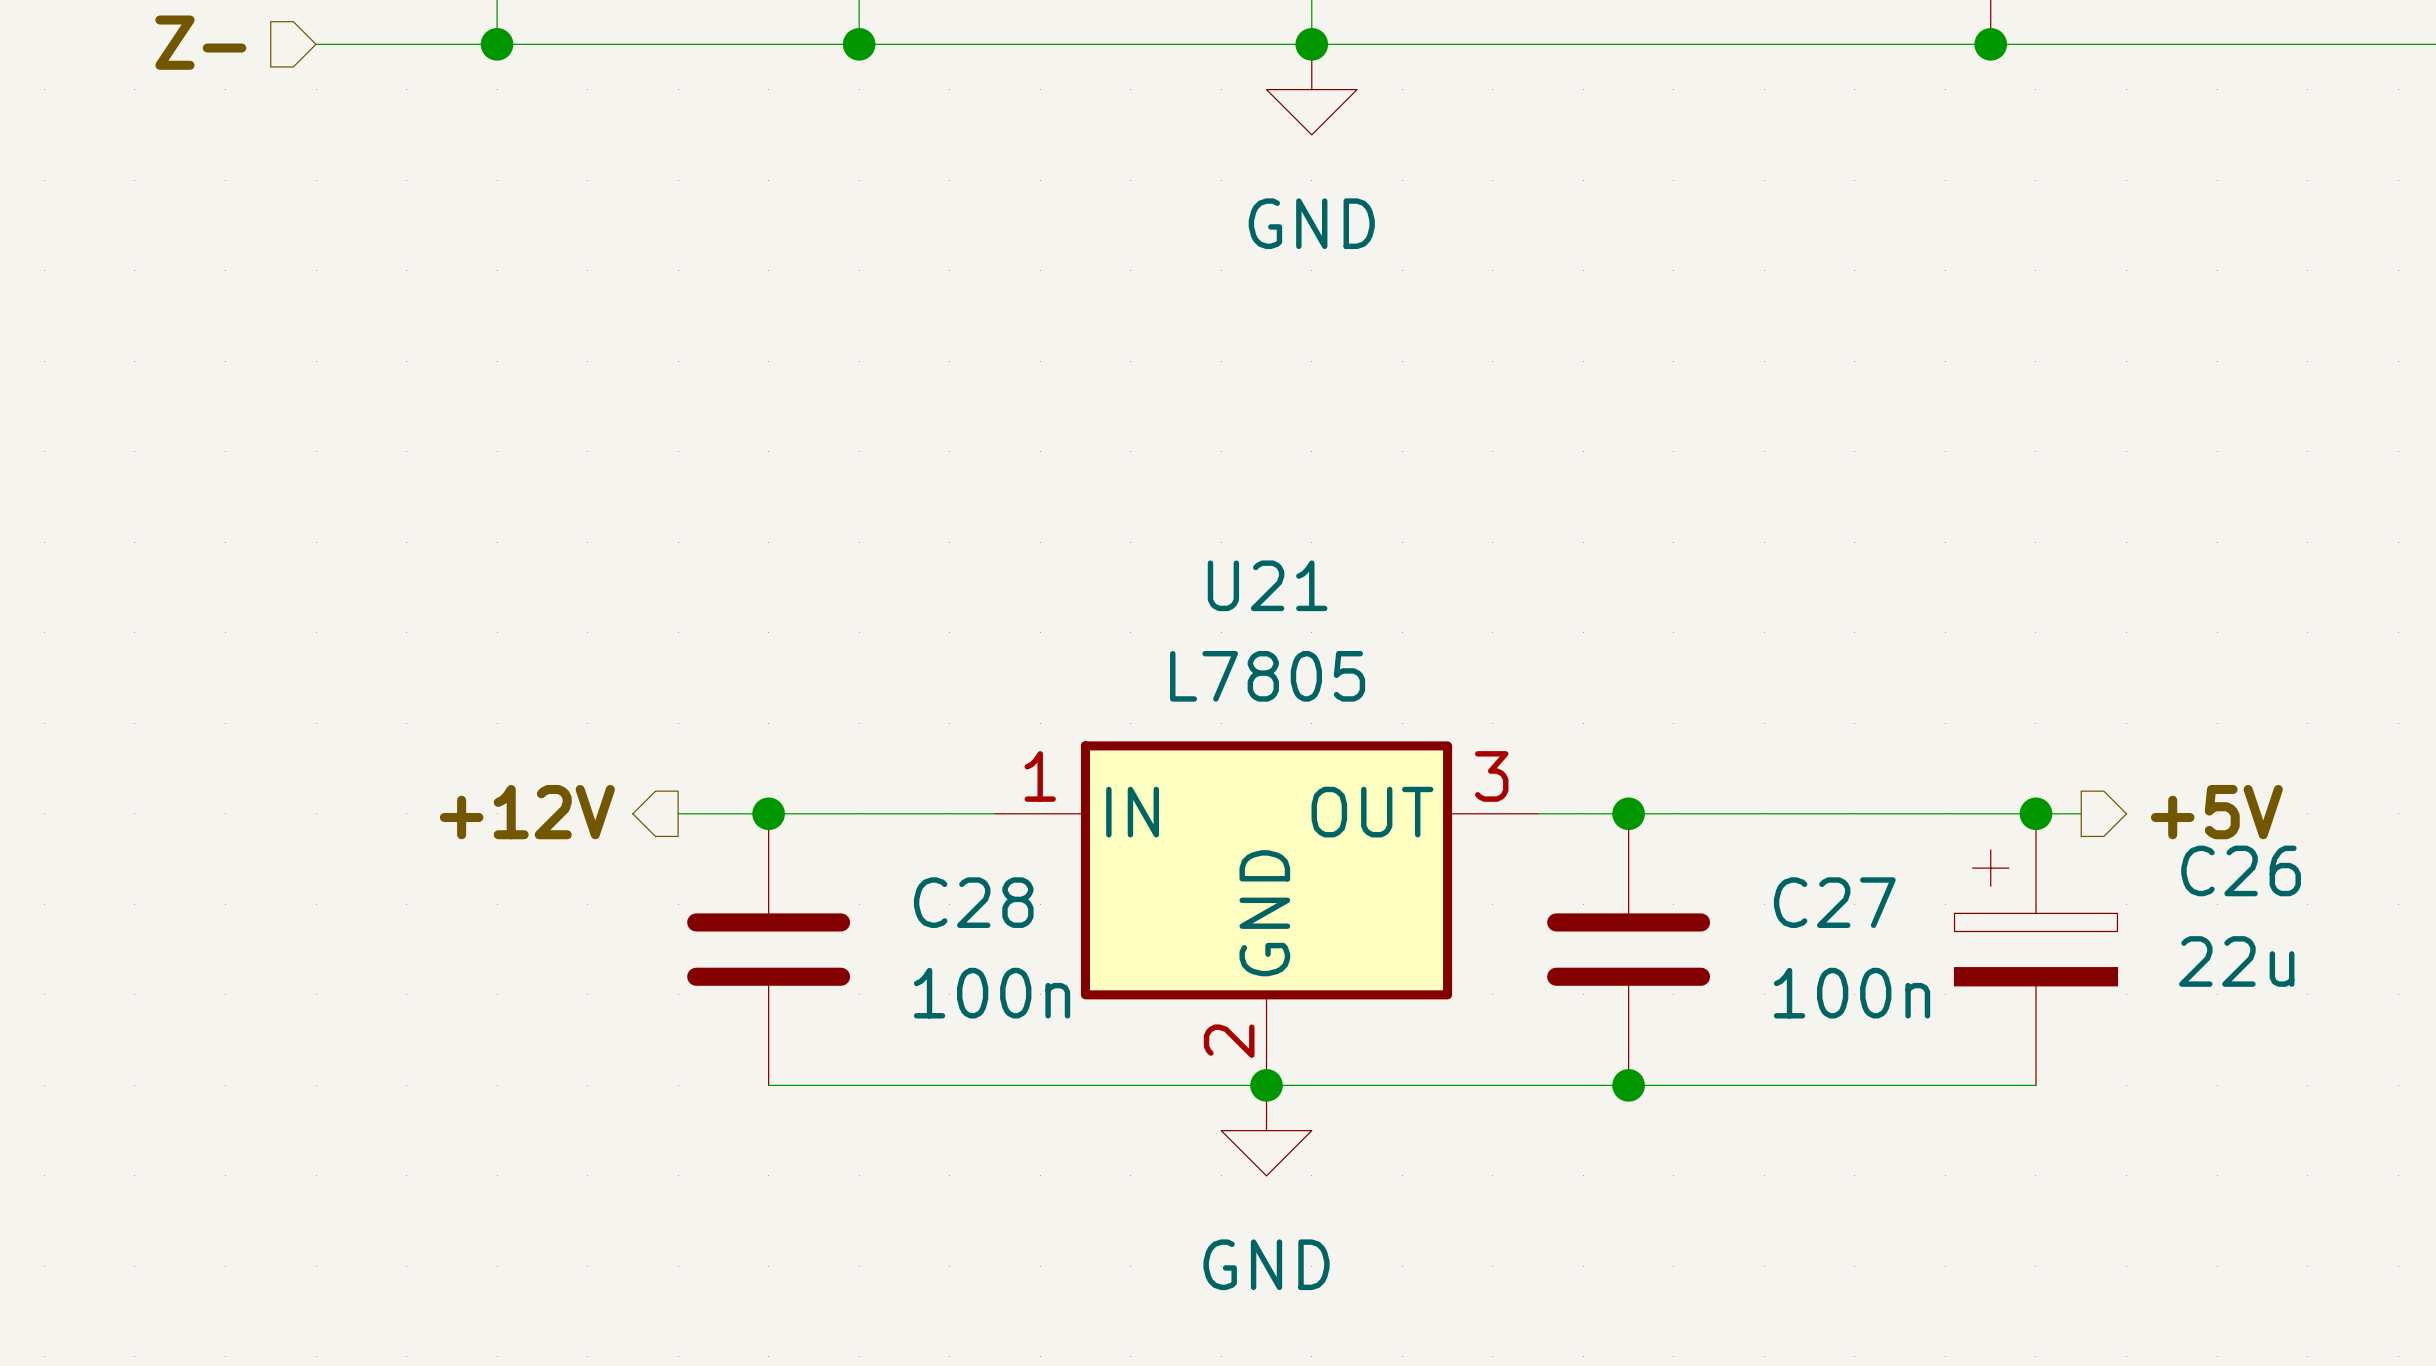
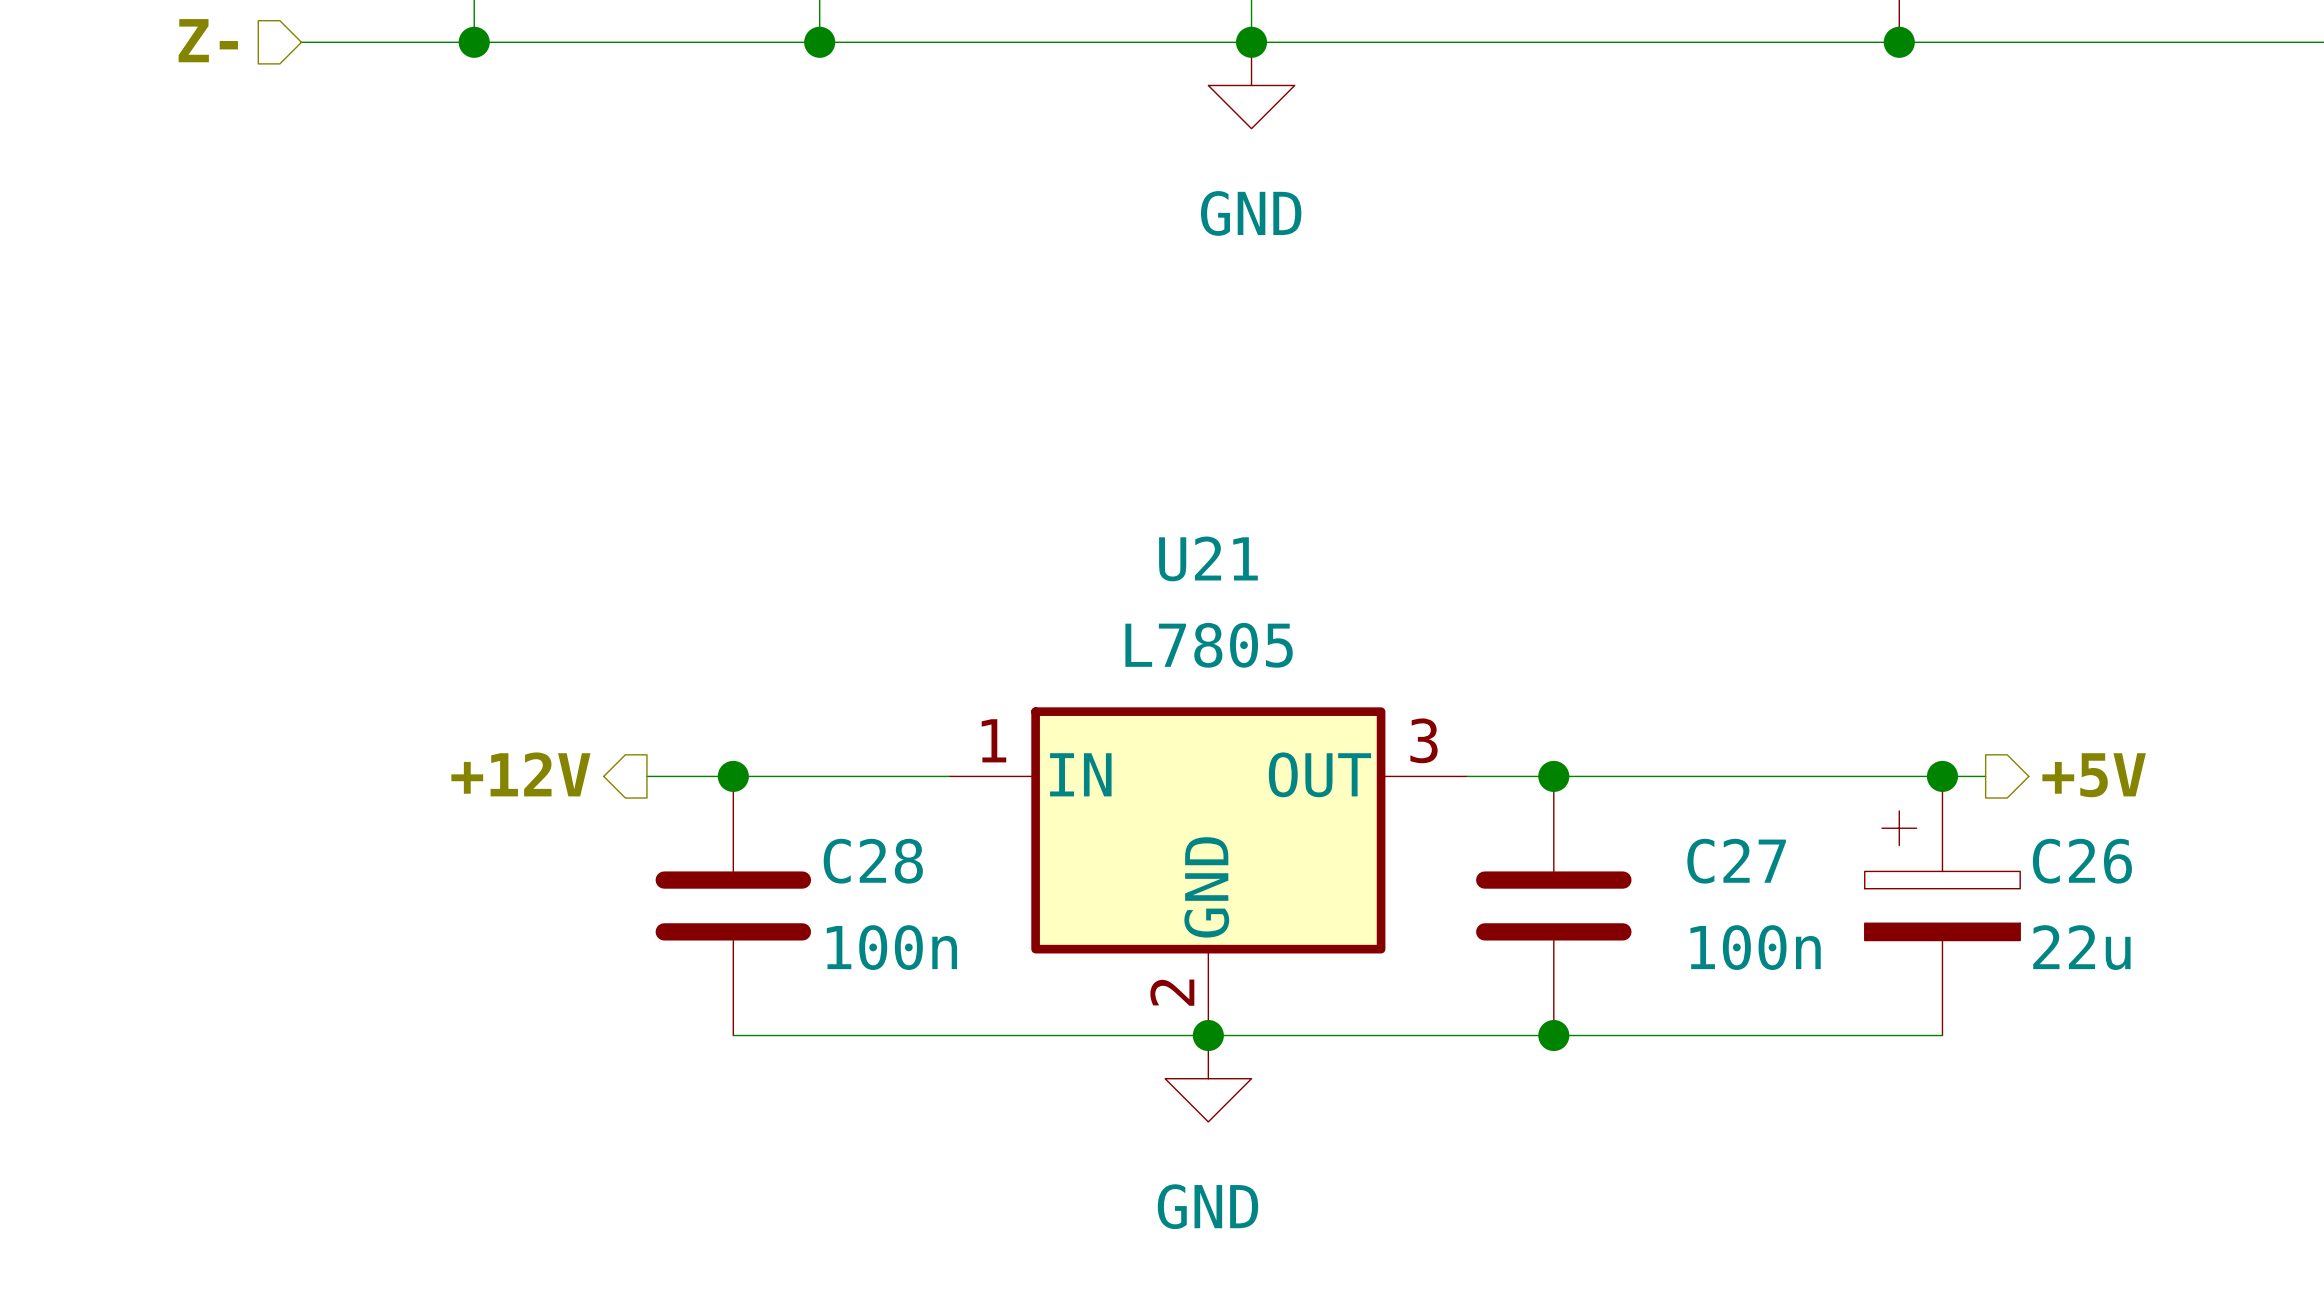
C26 name position: C26 (2241, 870) -> C26 (2082, 861)
C28 name position: C28 (973, 902) -> C28 (873, 861)
C26 value position: 22u (2236, 961) -> 22u (2081, 947)
C28 value position: 100n (992, 993) -> 100n (891, 947)

